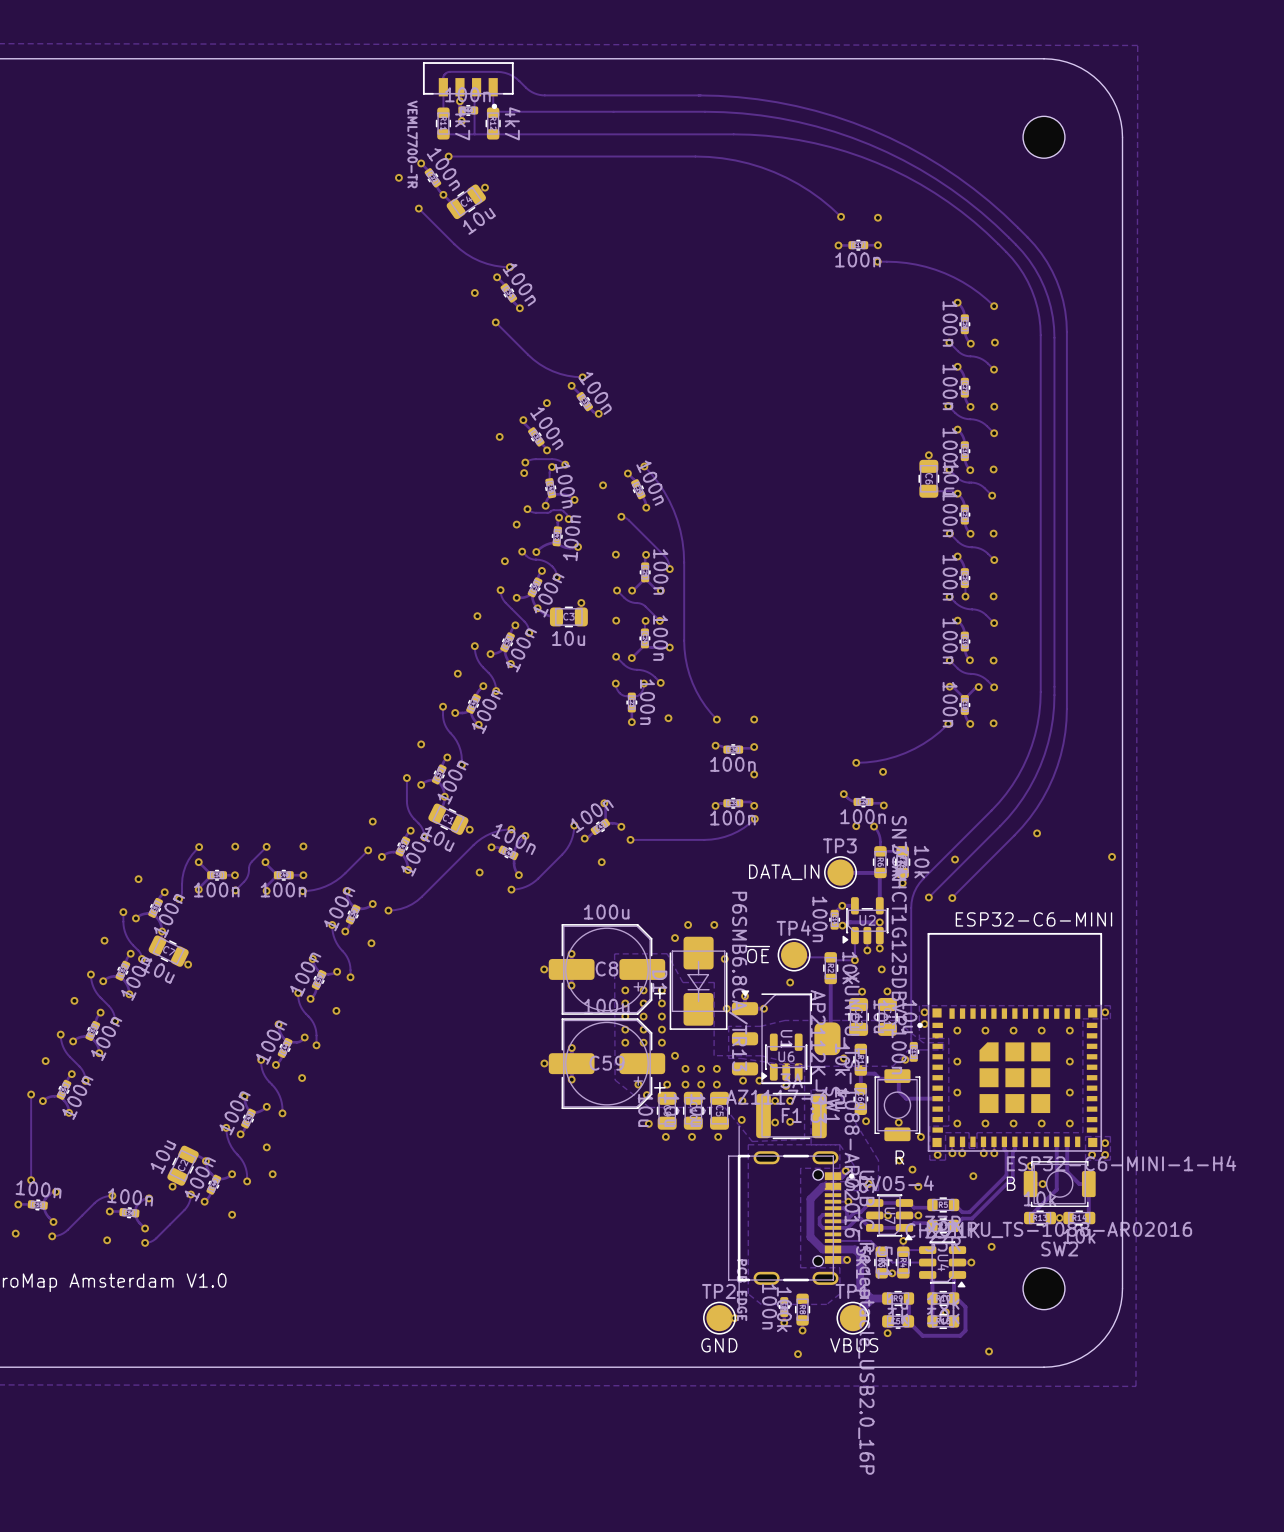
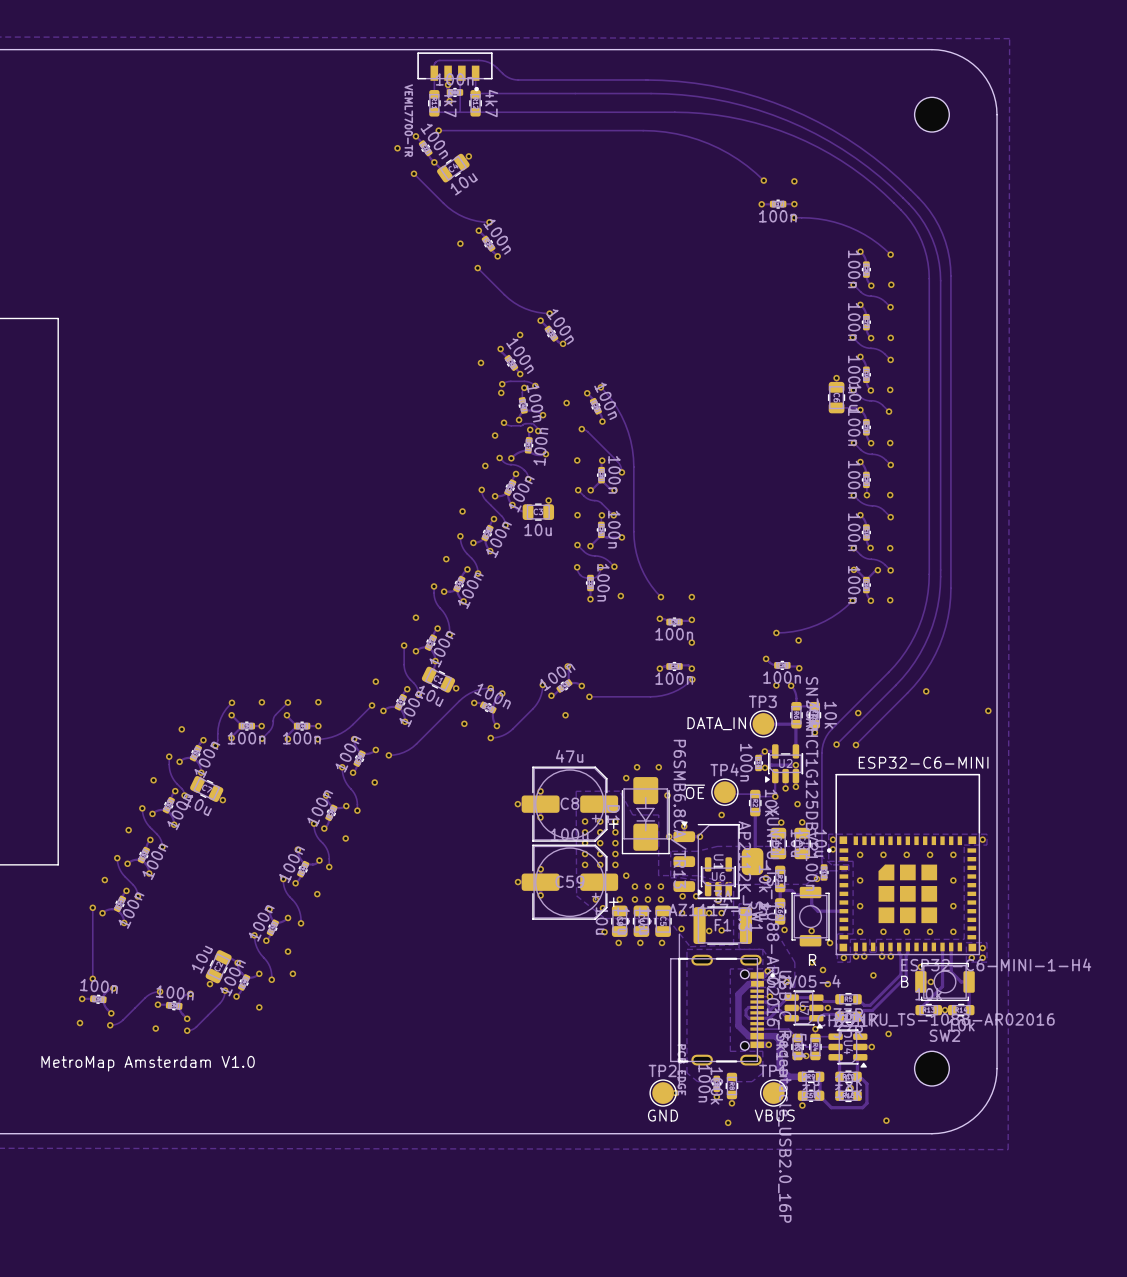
C8 value: 100u (606, 912) -> 47u (569, 756)

